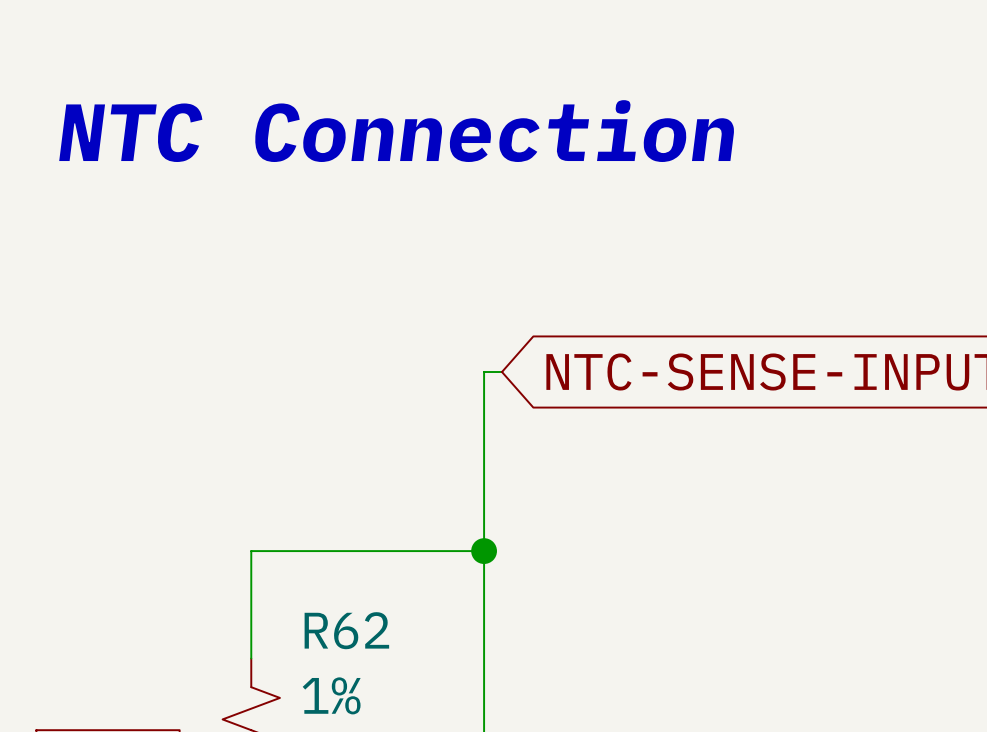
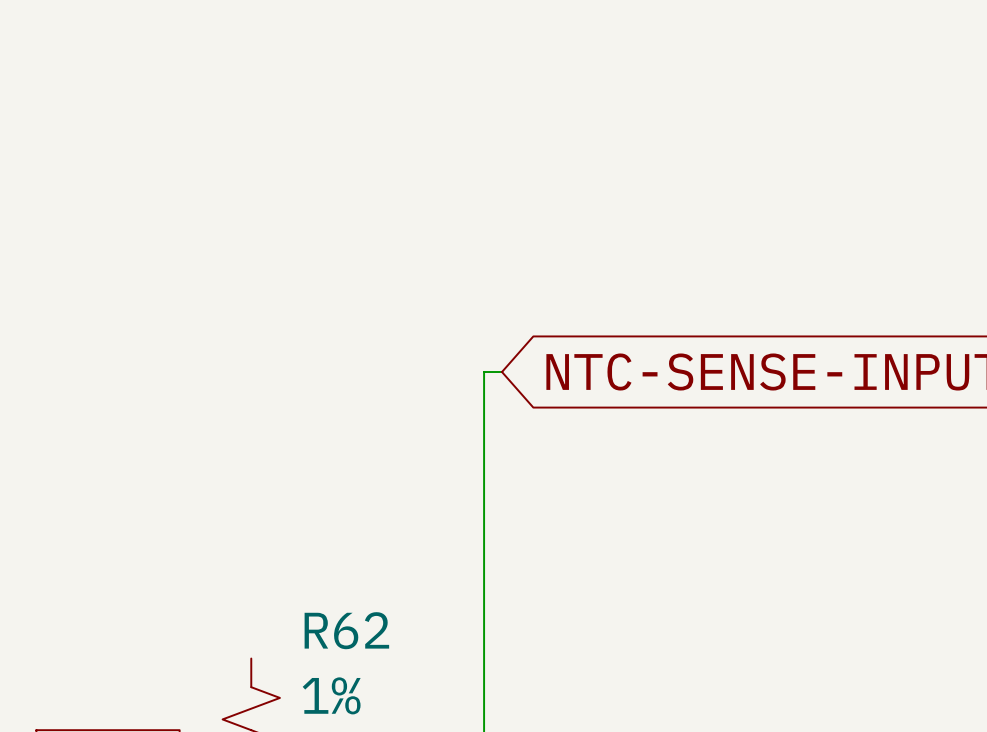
text: NTC Connection (396, 131) -> none
wire: (484, 551) (251, 551) (251, 658) -> none
junction: (484, 551) -> none

